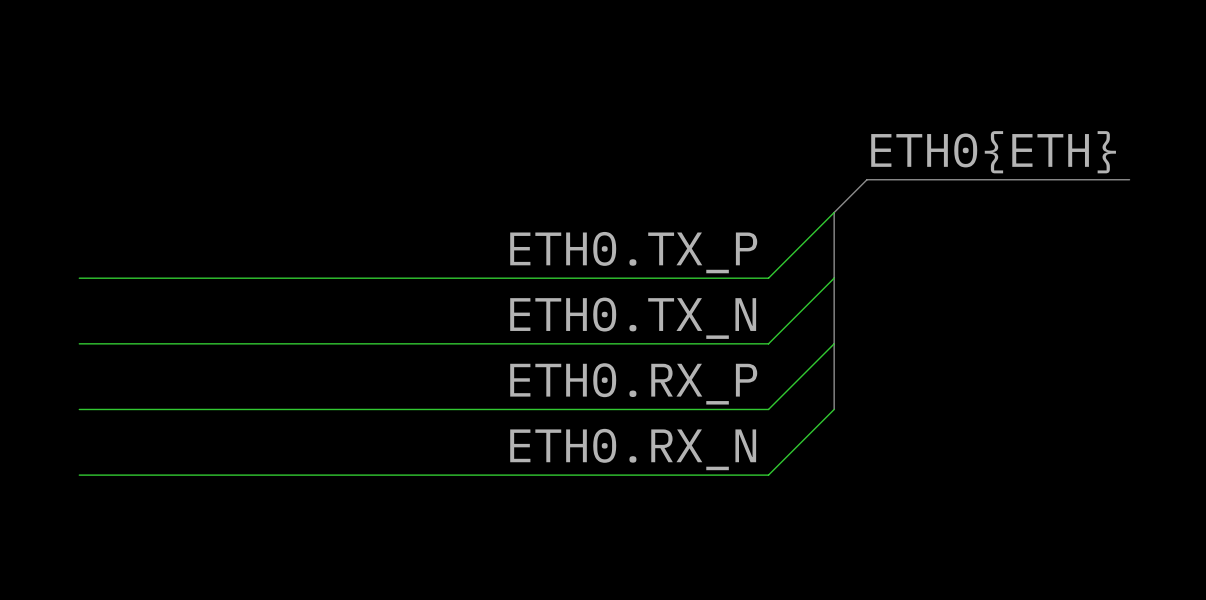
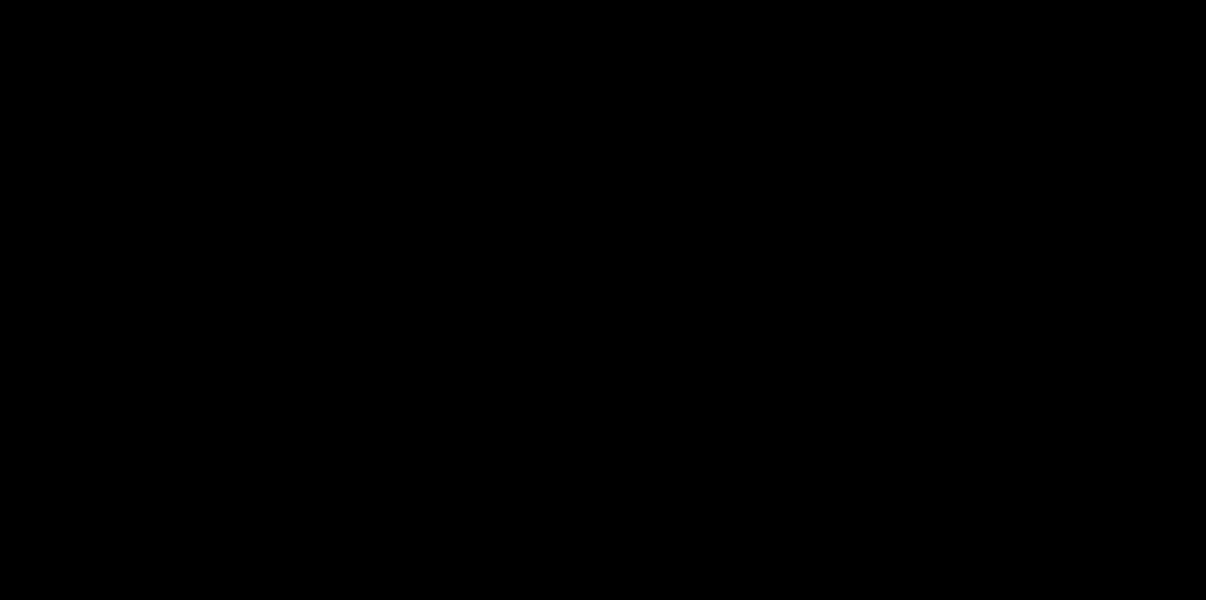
label: ETH0{ETH} (993, 152) -> none
bus: (1129, 179) (866, 179) (834, 212) (834, 409) -> none
wire: (834, 212) (768, 278) (79, 278) -> none
label: ETH0.TX_P (633, 252) -> none
wire: (834, 278) (768, 343) (79, 343) -> none
label: ETH0.TX_N (633, 318) -> none
wire: (834, 343) (768, 409) (79, 409) -> none
label: ETH0.RX_P (633, 383) -> none
wire: (834, 409) (768, 475) (79, 475) -> none
label: ETH0.RX_N (633, 449) -> none

